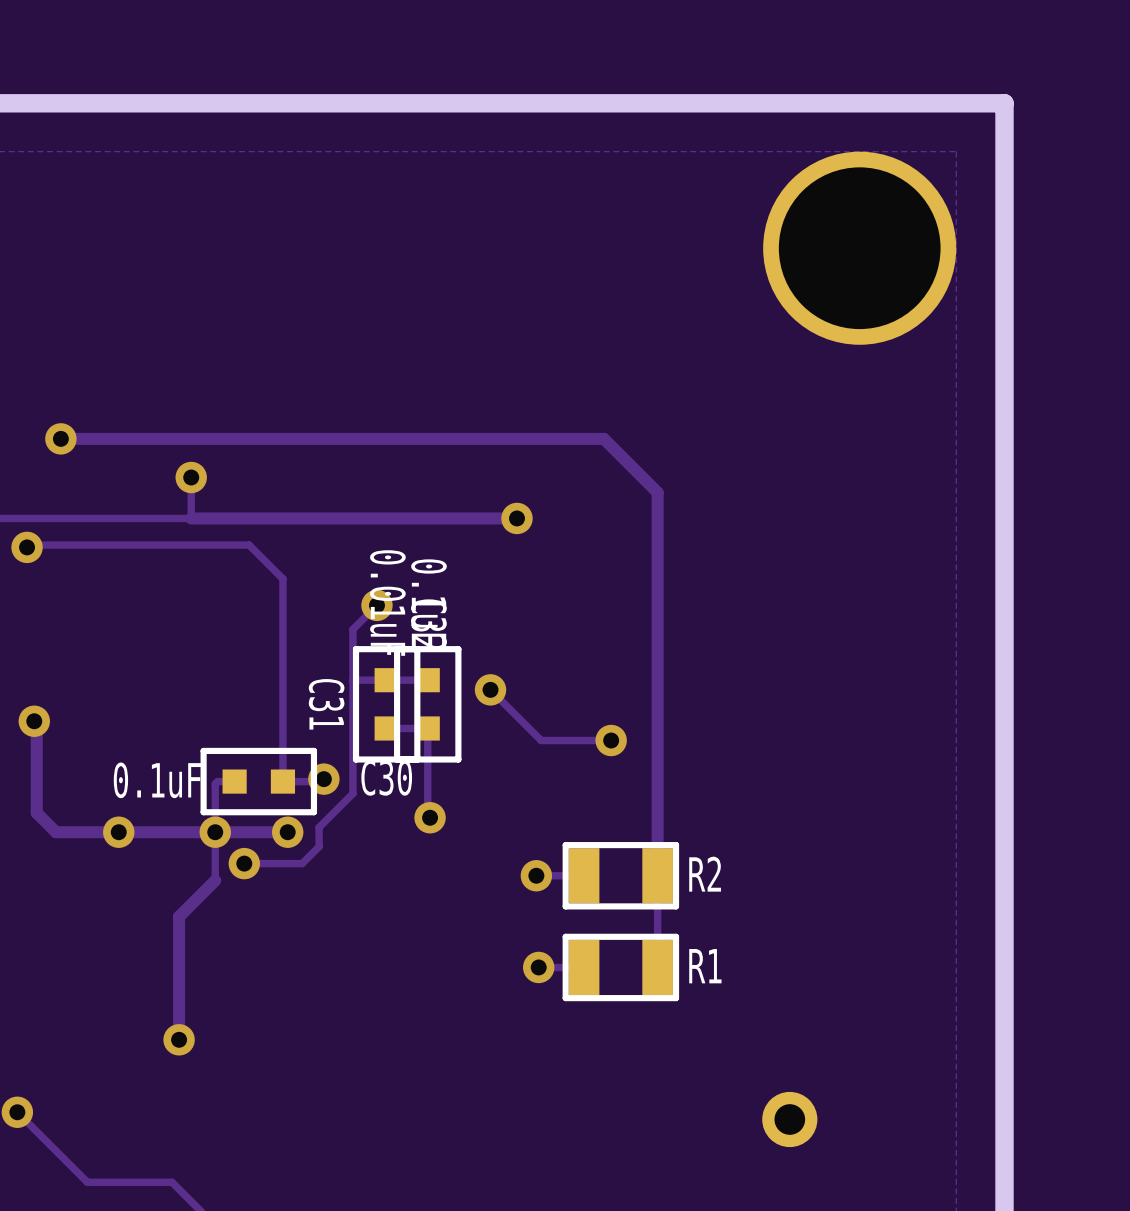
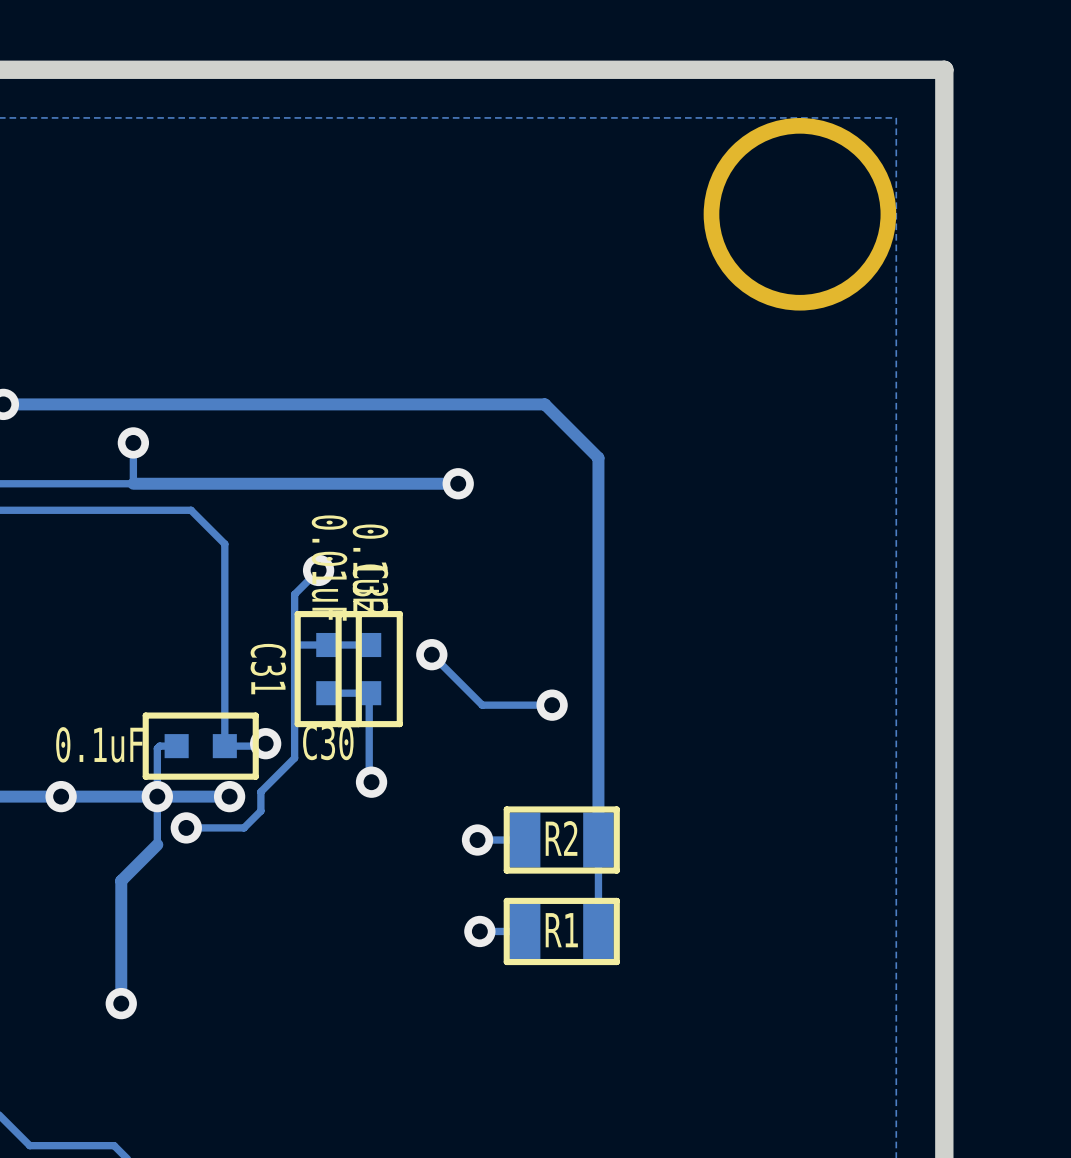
R2 name position: R2 (705, 874) -> R2 (561, 838)
R1 name position: R1 (705, 966) -> R1 (561, 930)
part: (789, 1119) -> none

